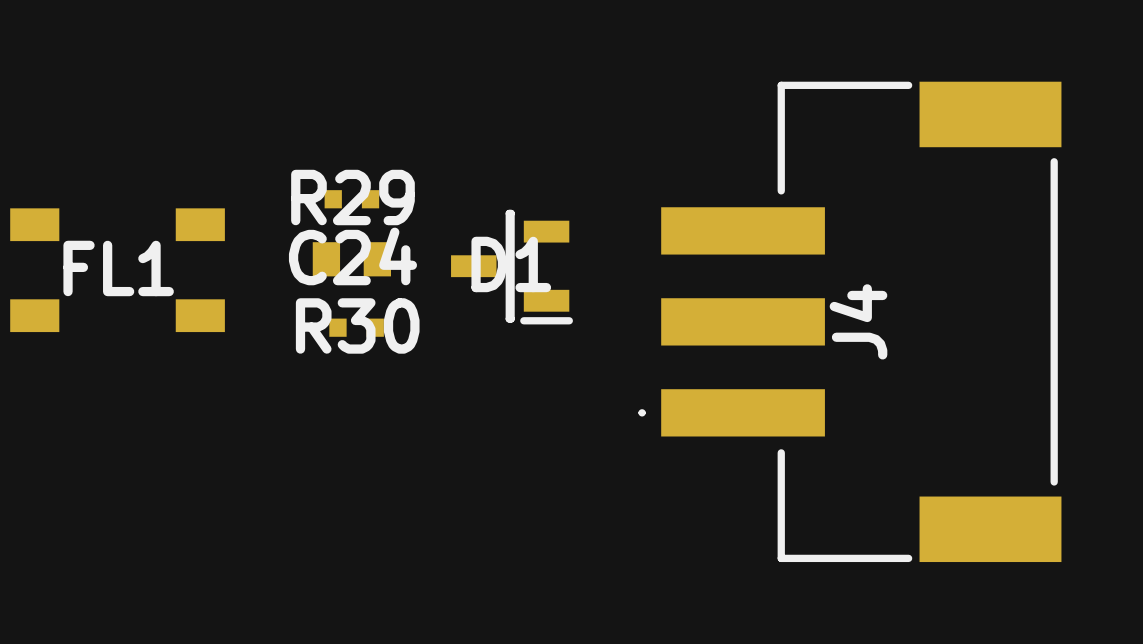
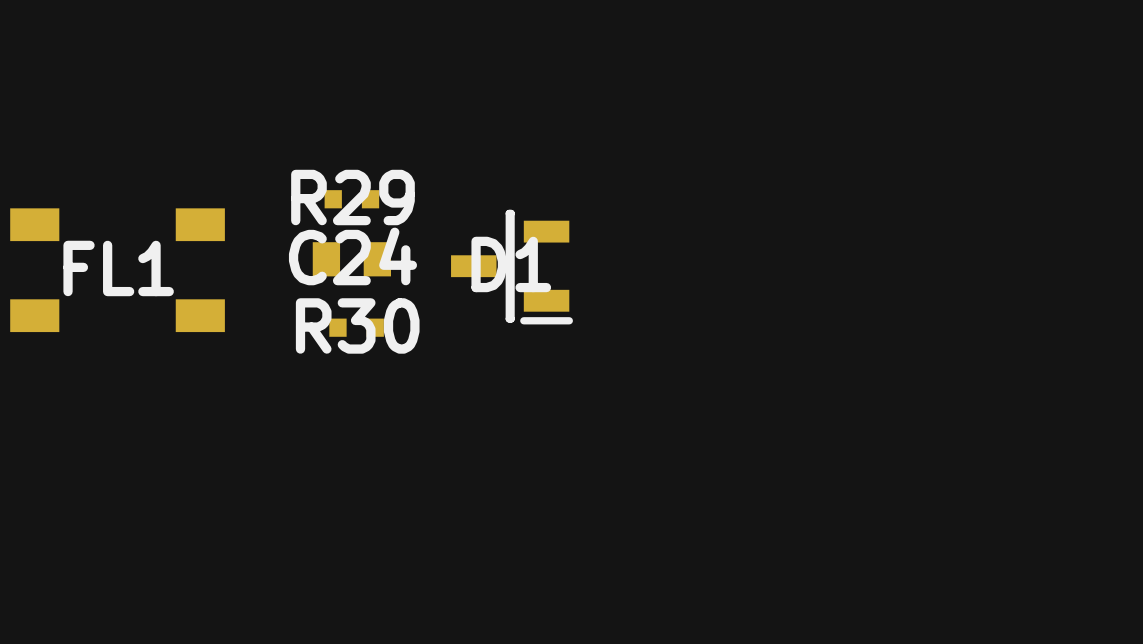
J4: (849, 321) -> none

